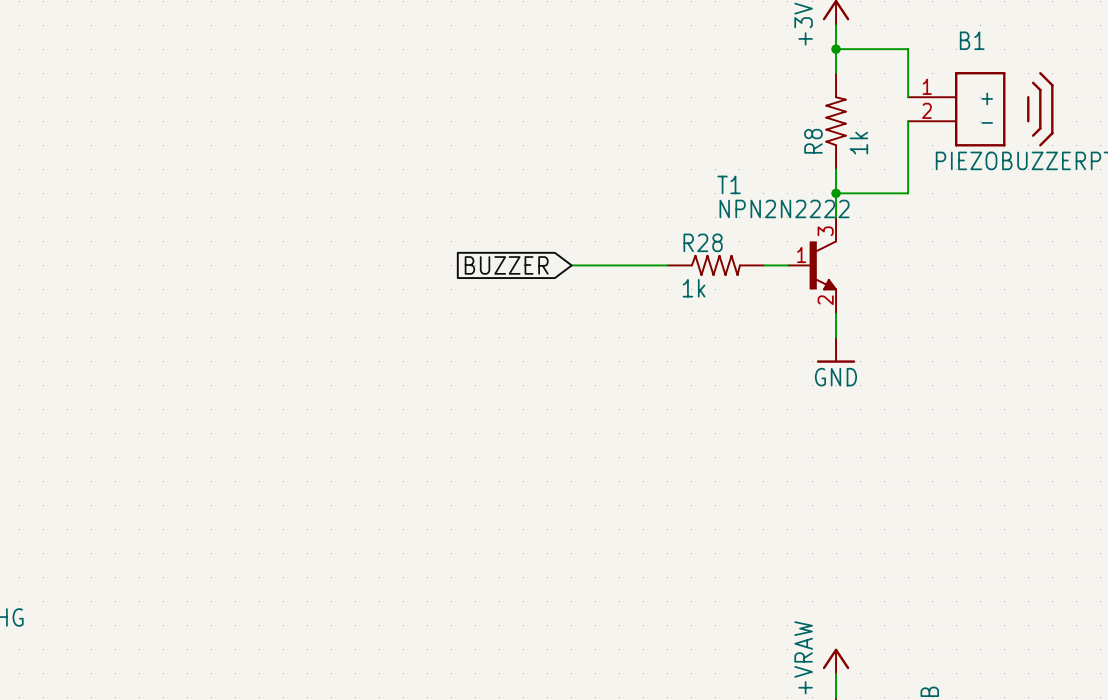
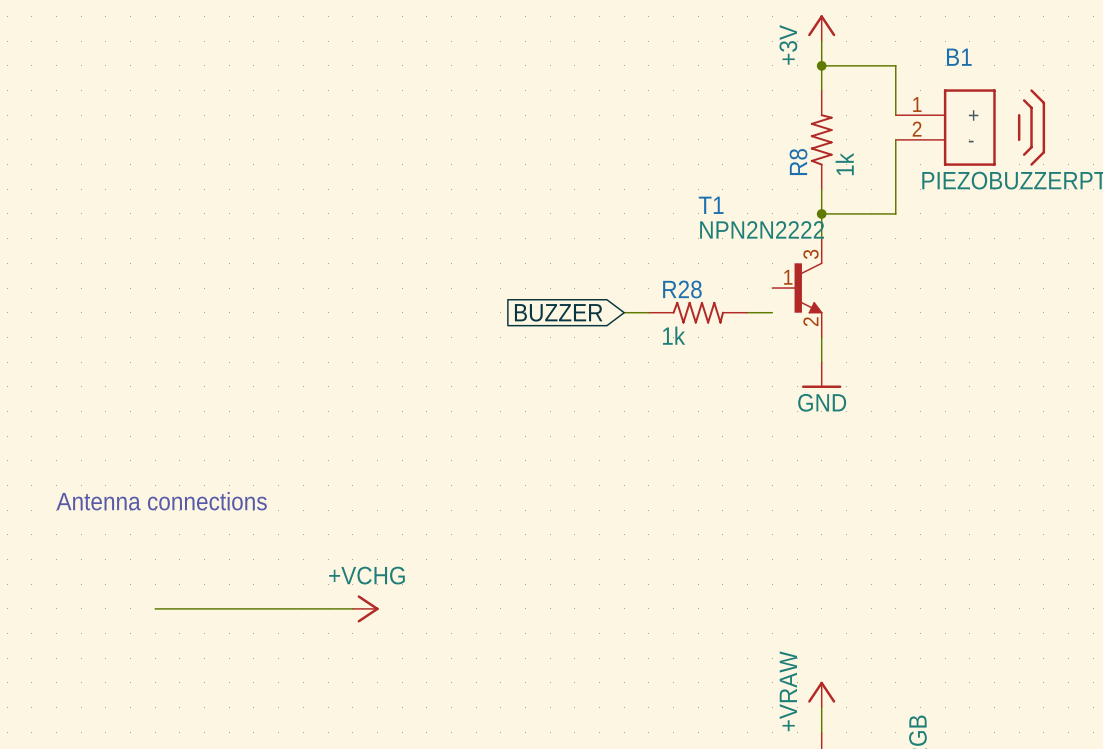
global label position: BUZZER (506, 265) -> BUZZER (558, 312)
wire: (571, 265) (667, 265) -> none
R28 position: (715, 265) -> (698, 312)
wire: (763, 265) (787, 265) -> (747, 312) (772, 312)
wire: none -> (624, 312) (648, 312)
text: none -> Antenna connections (161, 501)
wire: none -> (155, 608) (352, 608)
power symbol: none -> +VCHG (365, 608)

